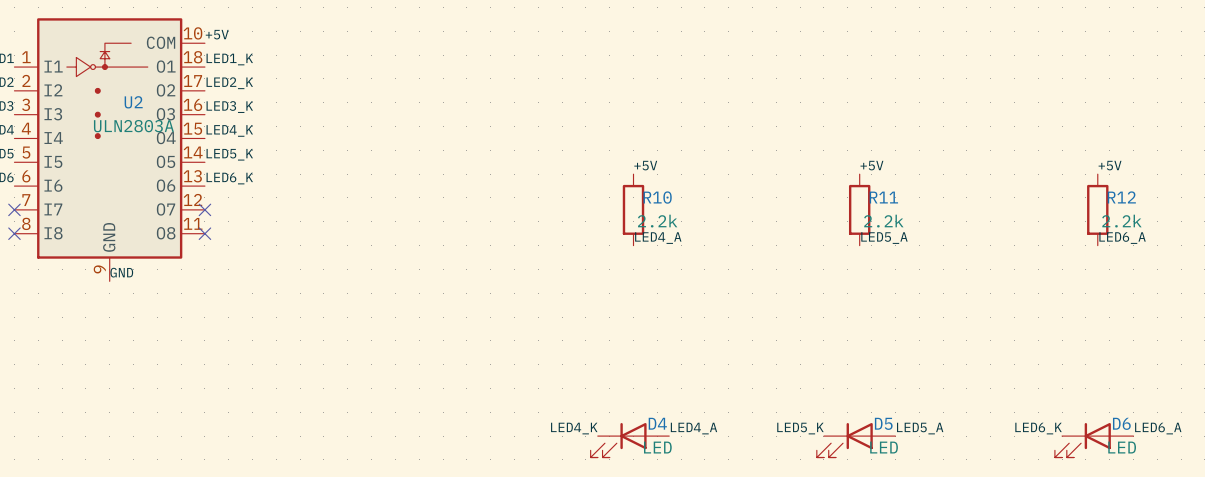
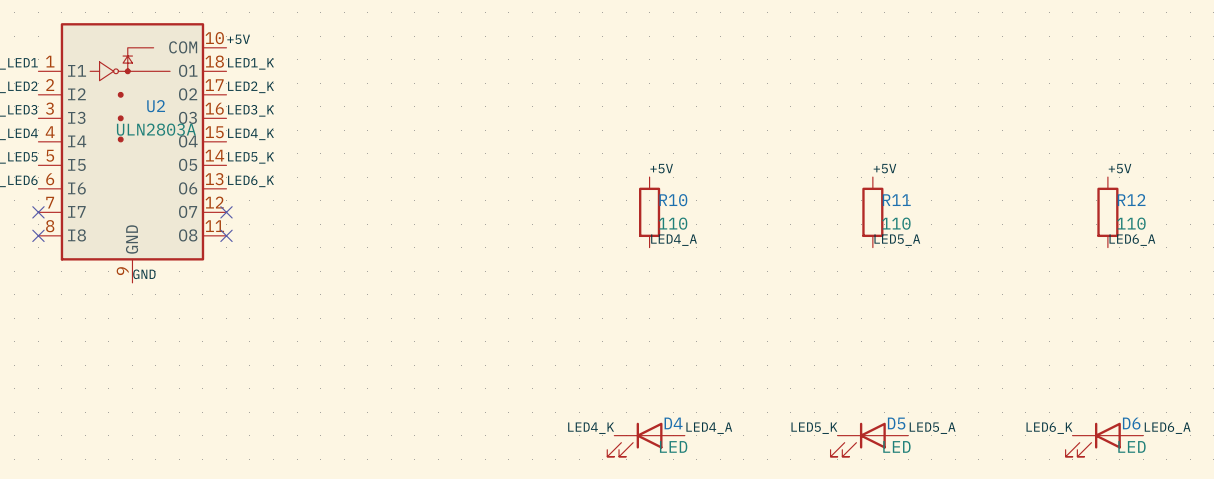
R10 value: 2.2k (657, 221) -> 110 (673, 223)
R11 value: 2.2k (883, 221) -> 110 (896, 223)
R12 value: 2.2k (1121, 221) -> 110 (1131, 223)

